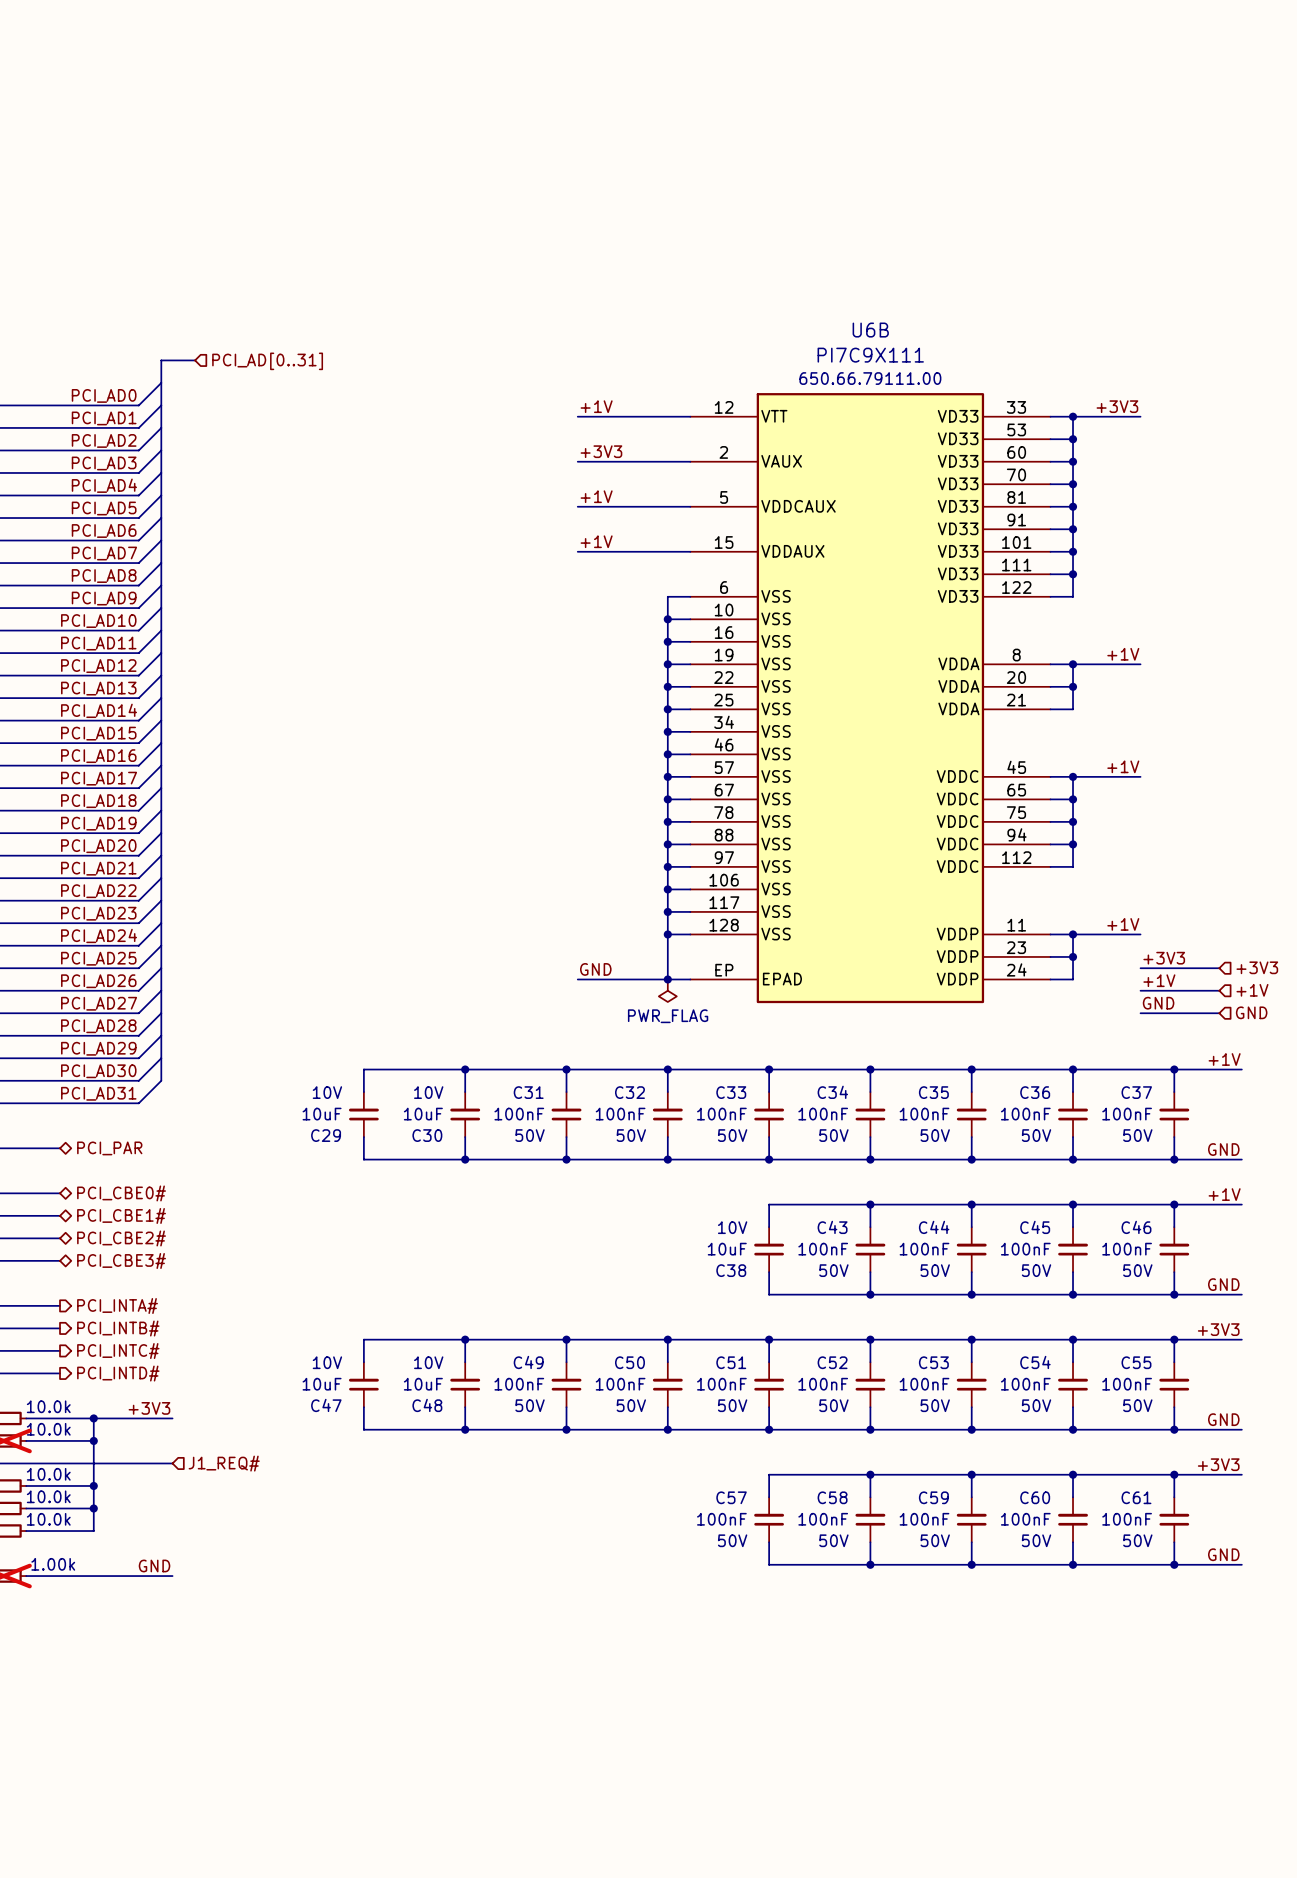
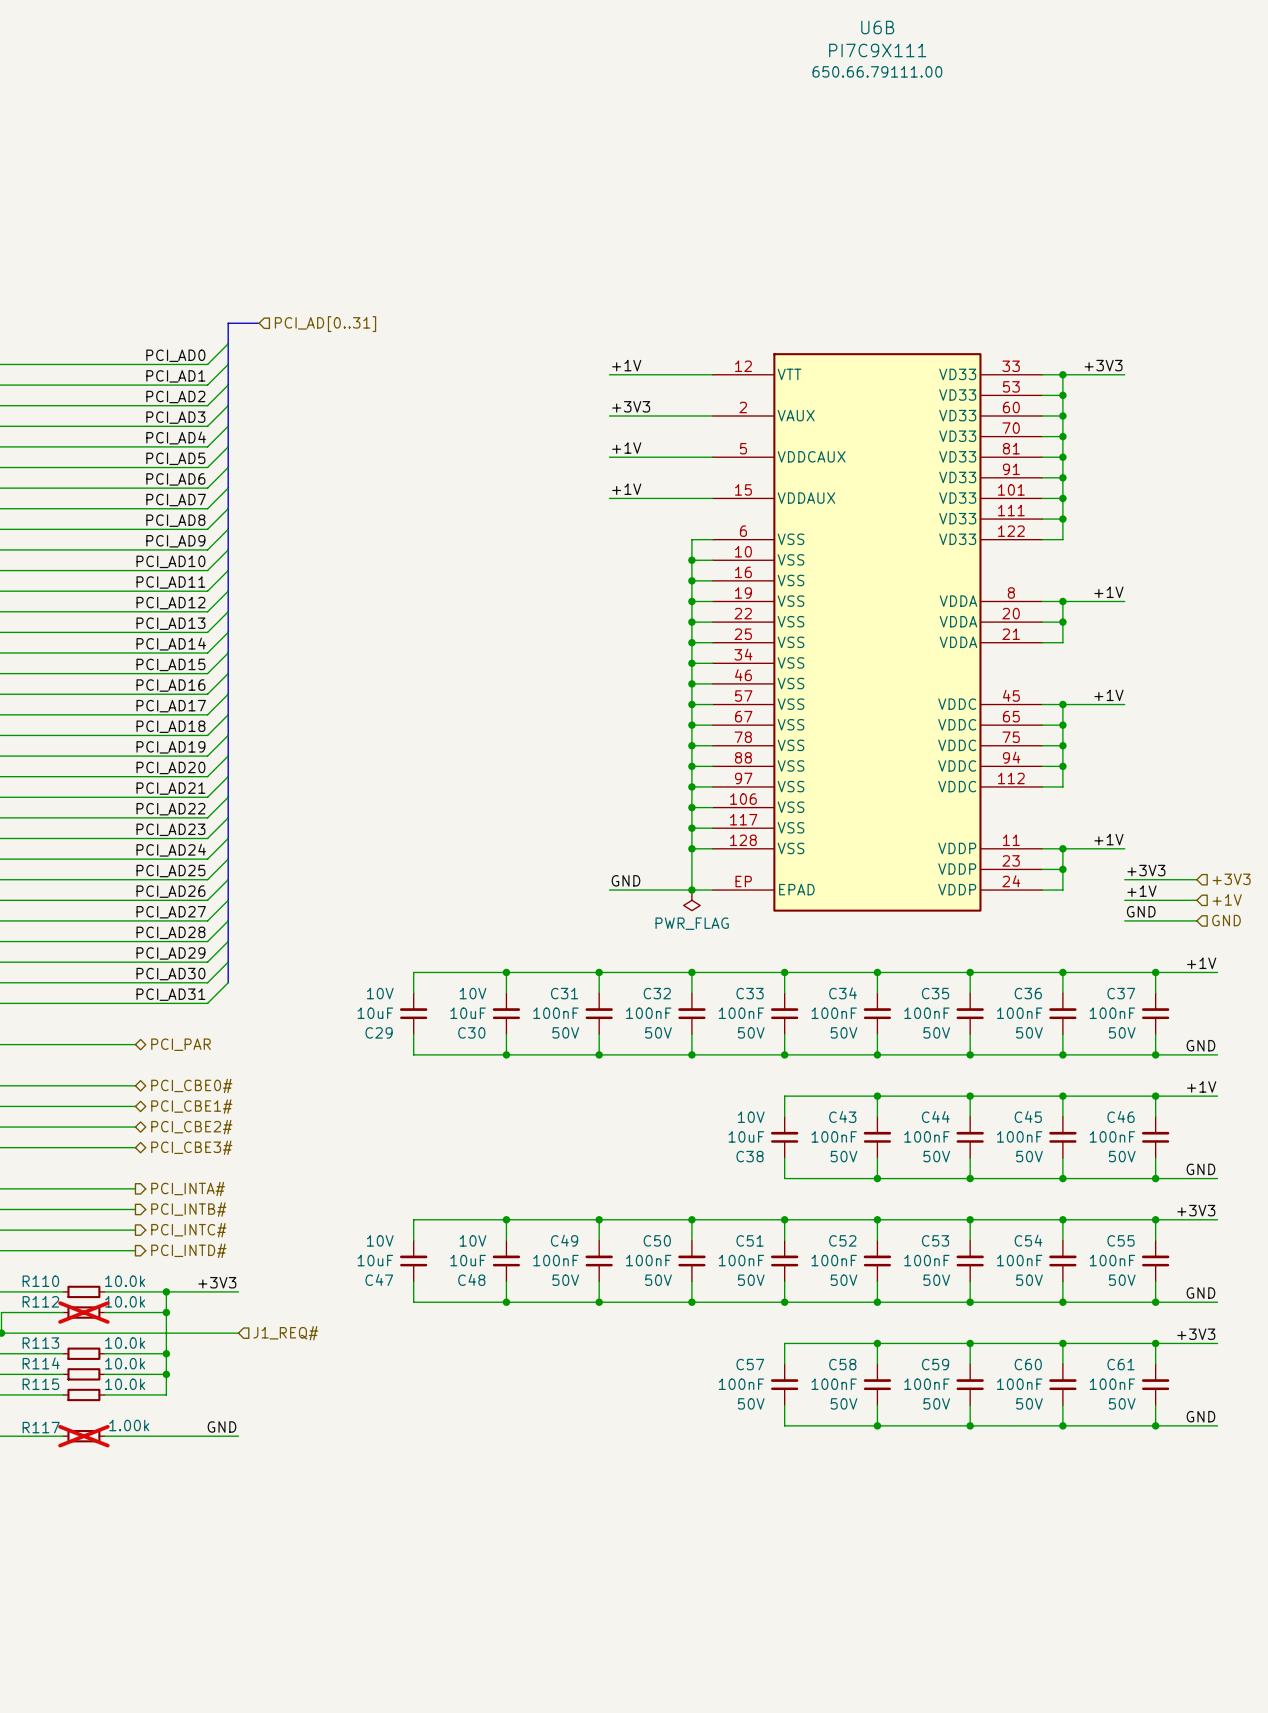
U6B name position: U6B (870, 330) -> U6B (877, 27)
U6B value position: PI7C9X111 (870, 355) -> PI7C9X111 (877, 50)
U6B text position: 650.66.79111.00 (870, 378) -> 650.66.79111.00 (877, 71)

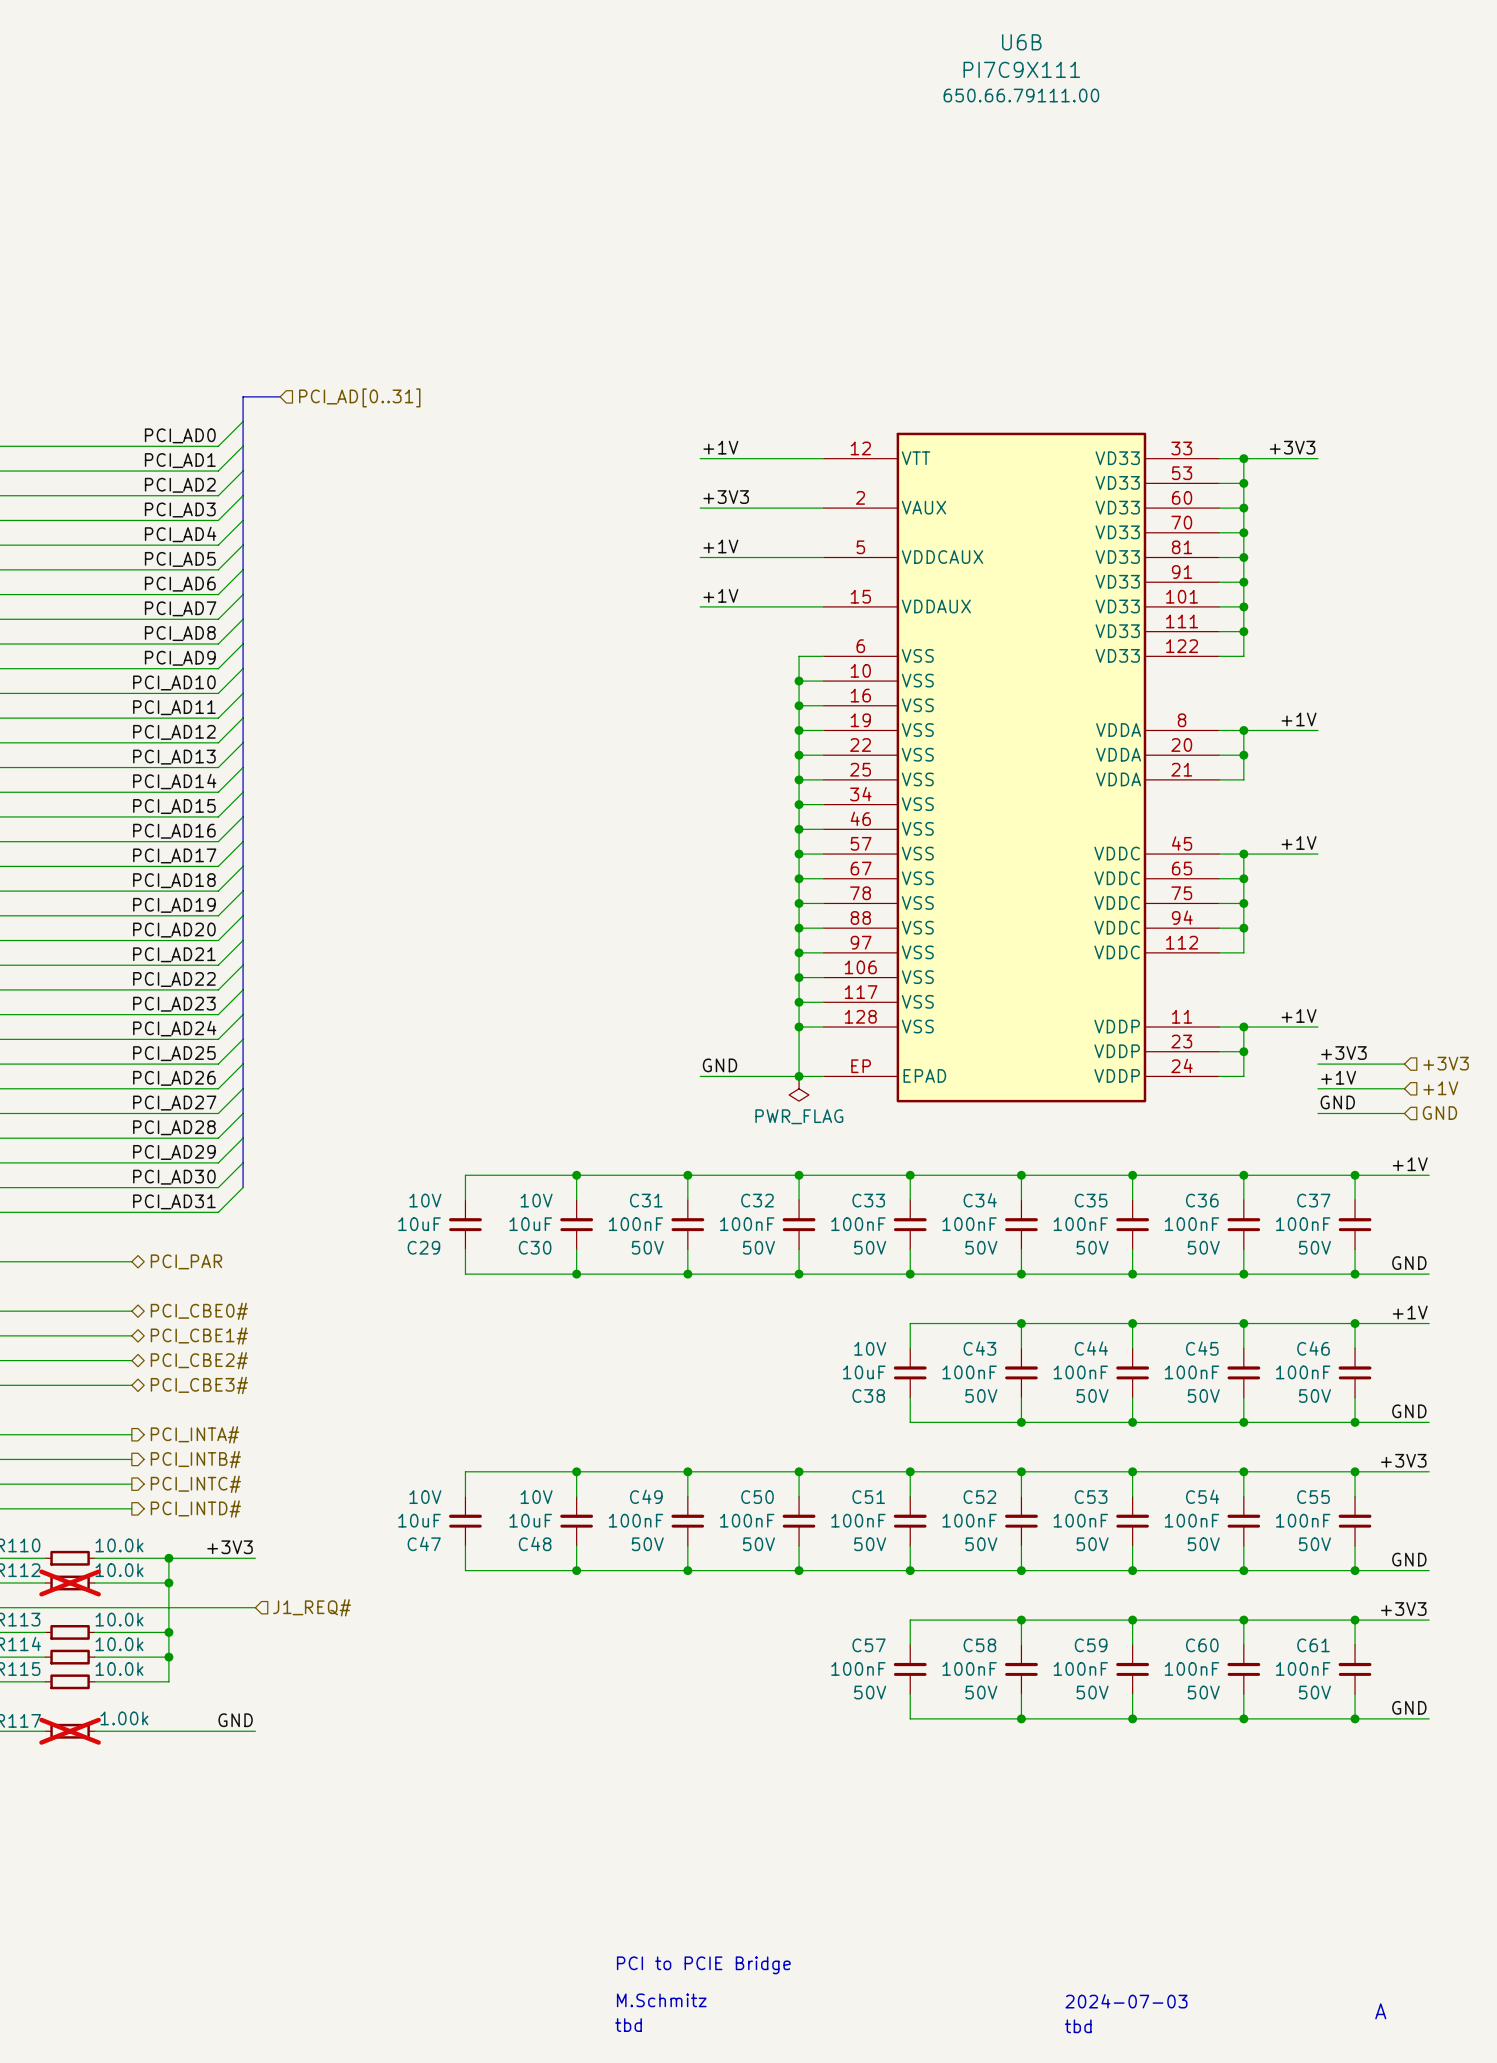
text: none -> PCI to PCIE Bridge (703, 1965)
text: none -> M.Schmitz (661, 2000)
text: none -> 2024-07-03 (1126, 2001)
text: none -> A (1380, 2011)
text: none -> tbd (628, 2025)
text: none -> tbd (1078, 2026)

